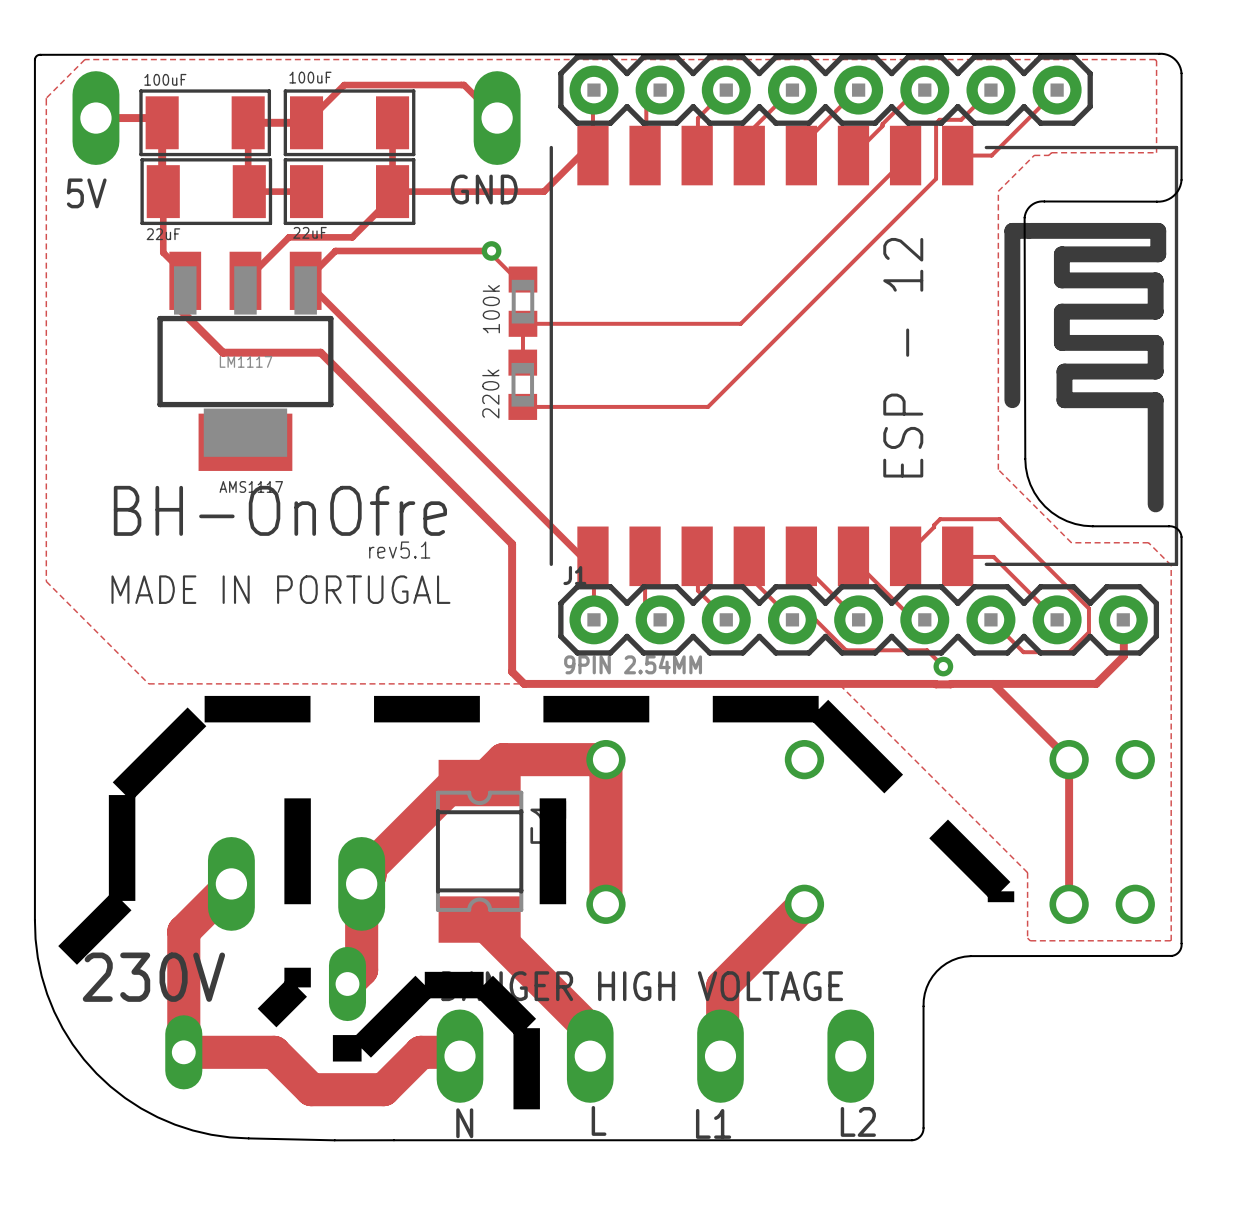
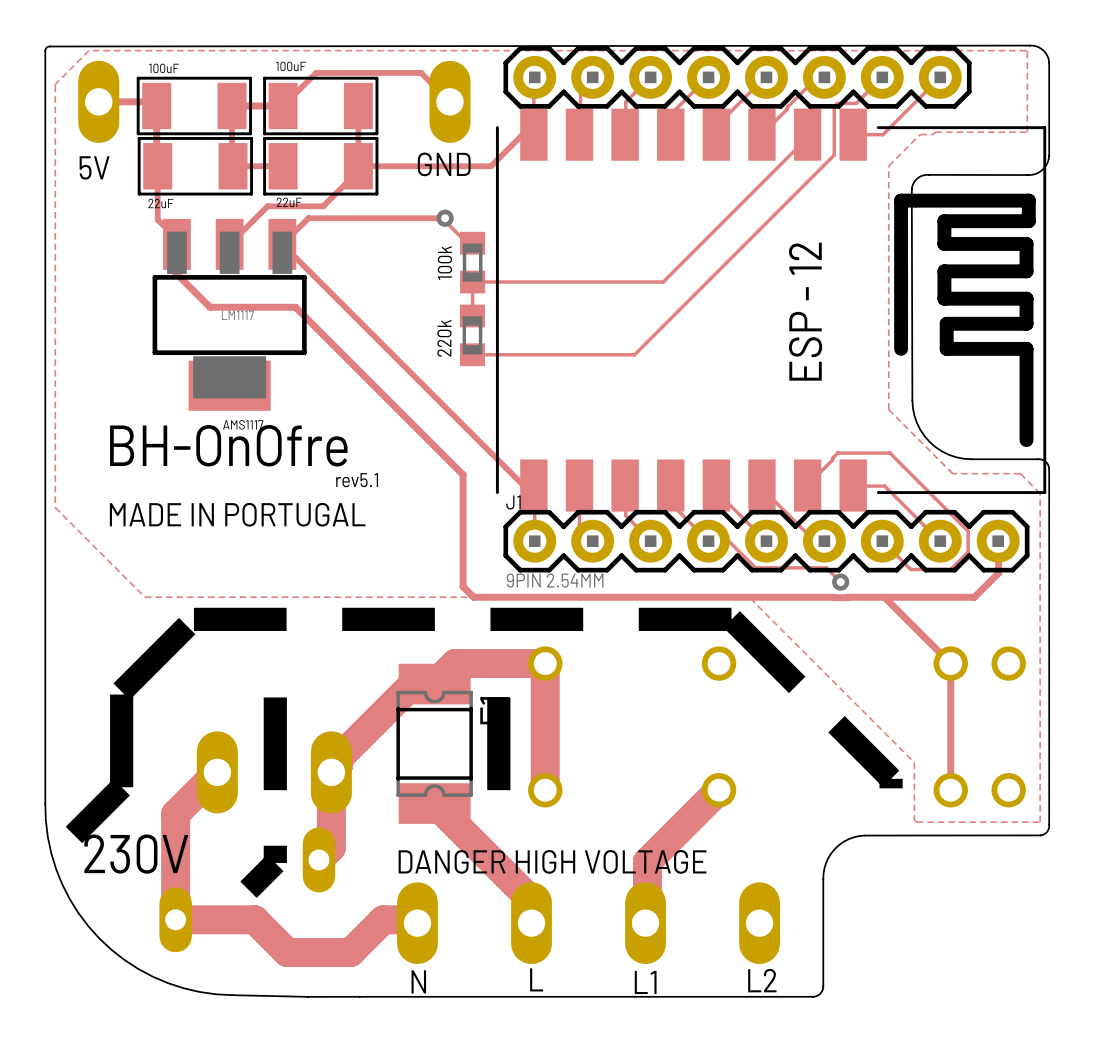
board edge: (332, 1048) (361, 1048) (424, 985) (483, 985) (526, 1028) (526, 1109) -> none

